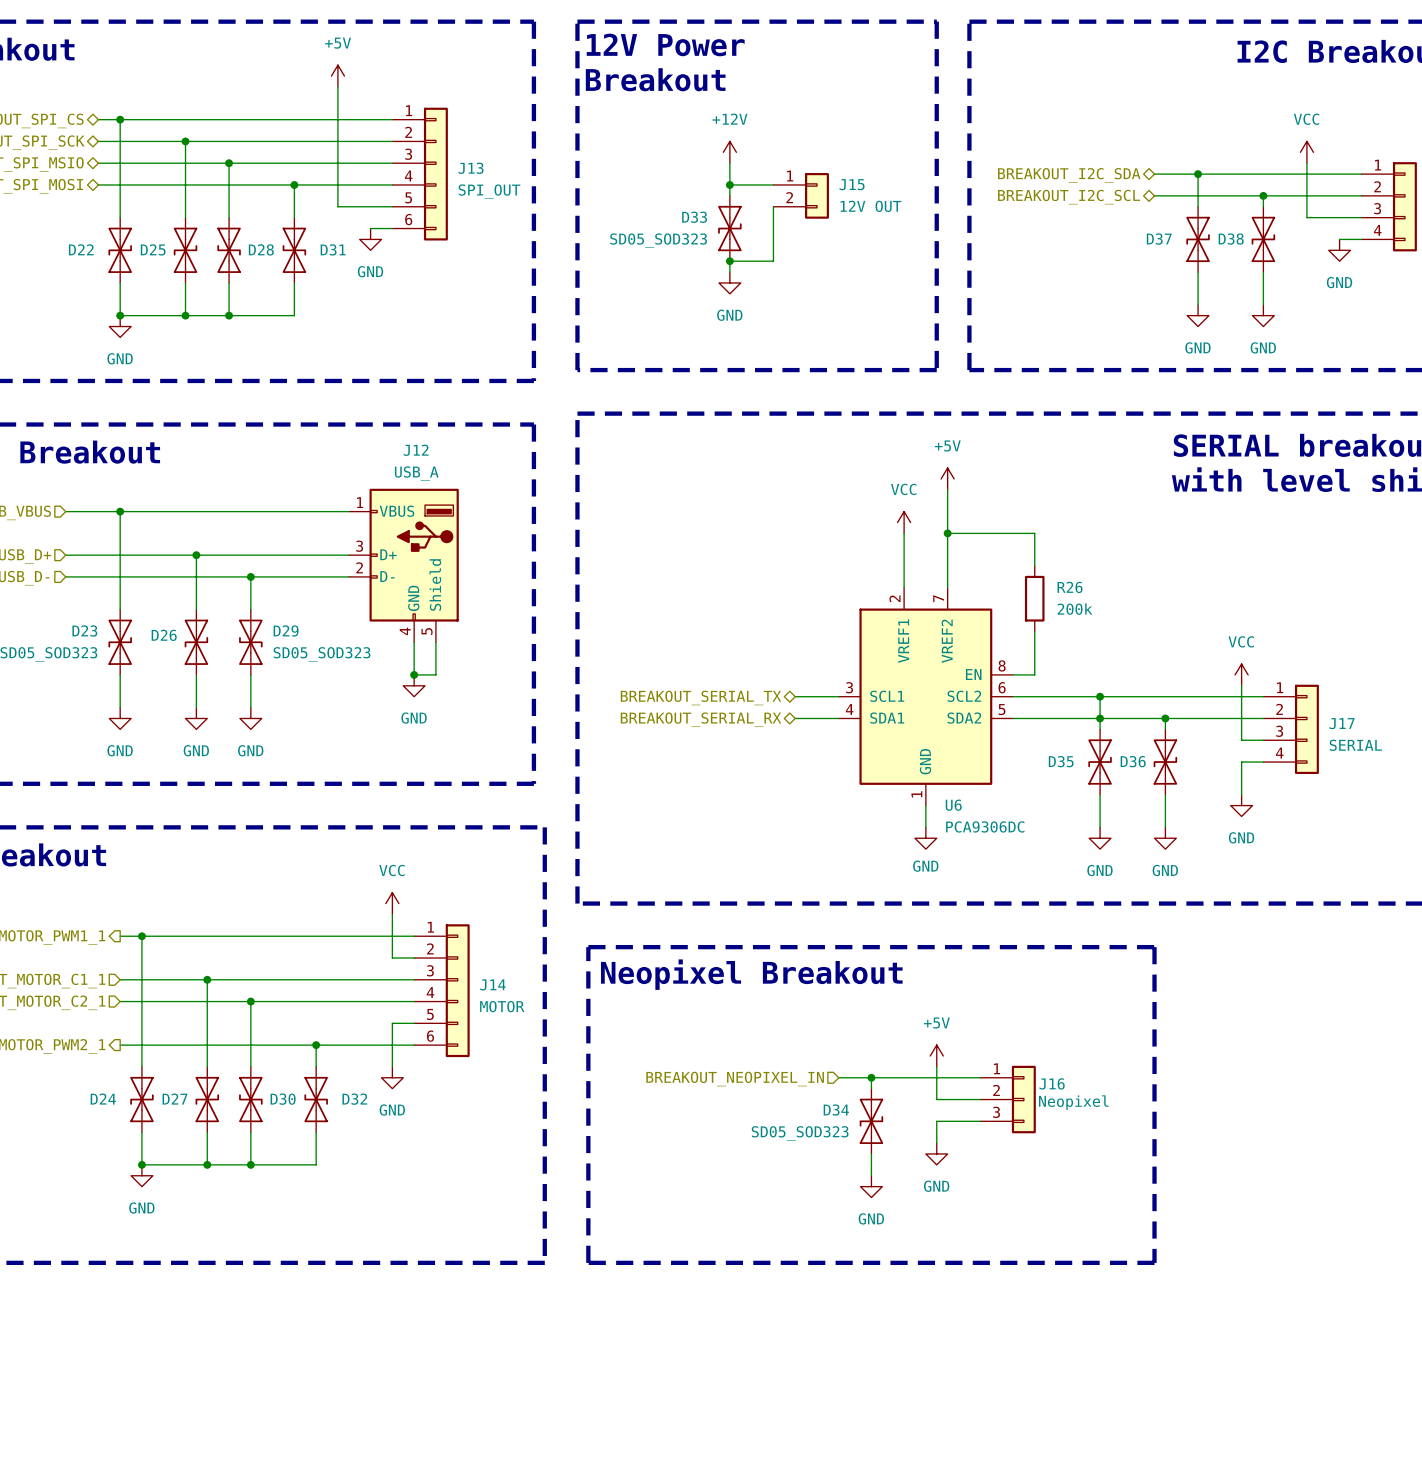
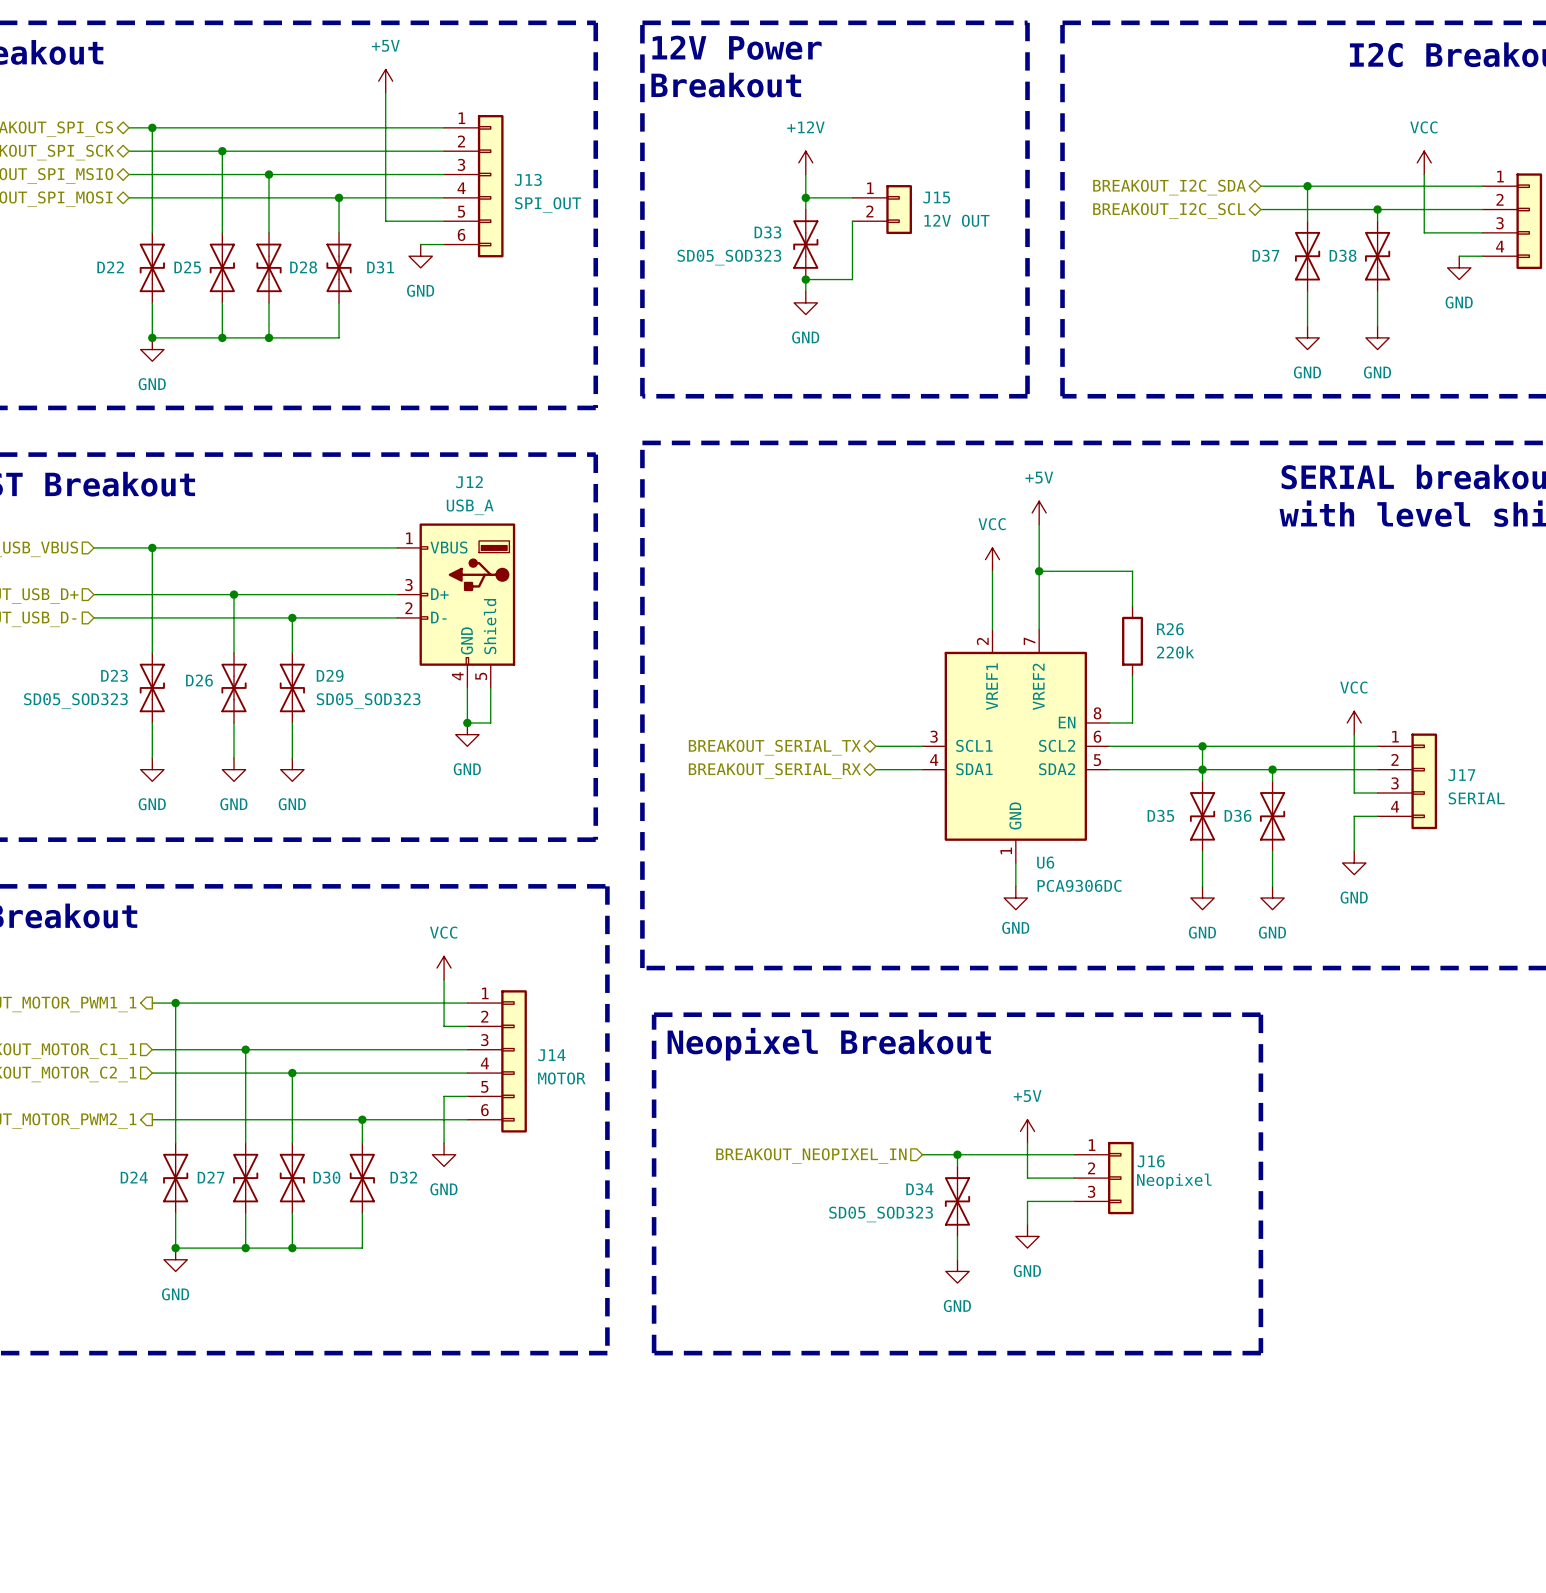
R26 value: 200k (1074, 609) -> 220k (1175, 652)

